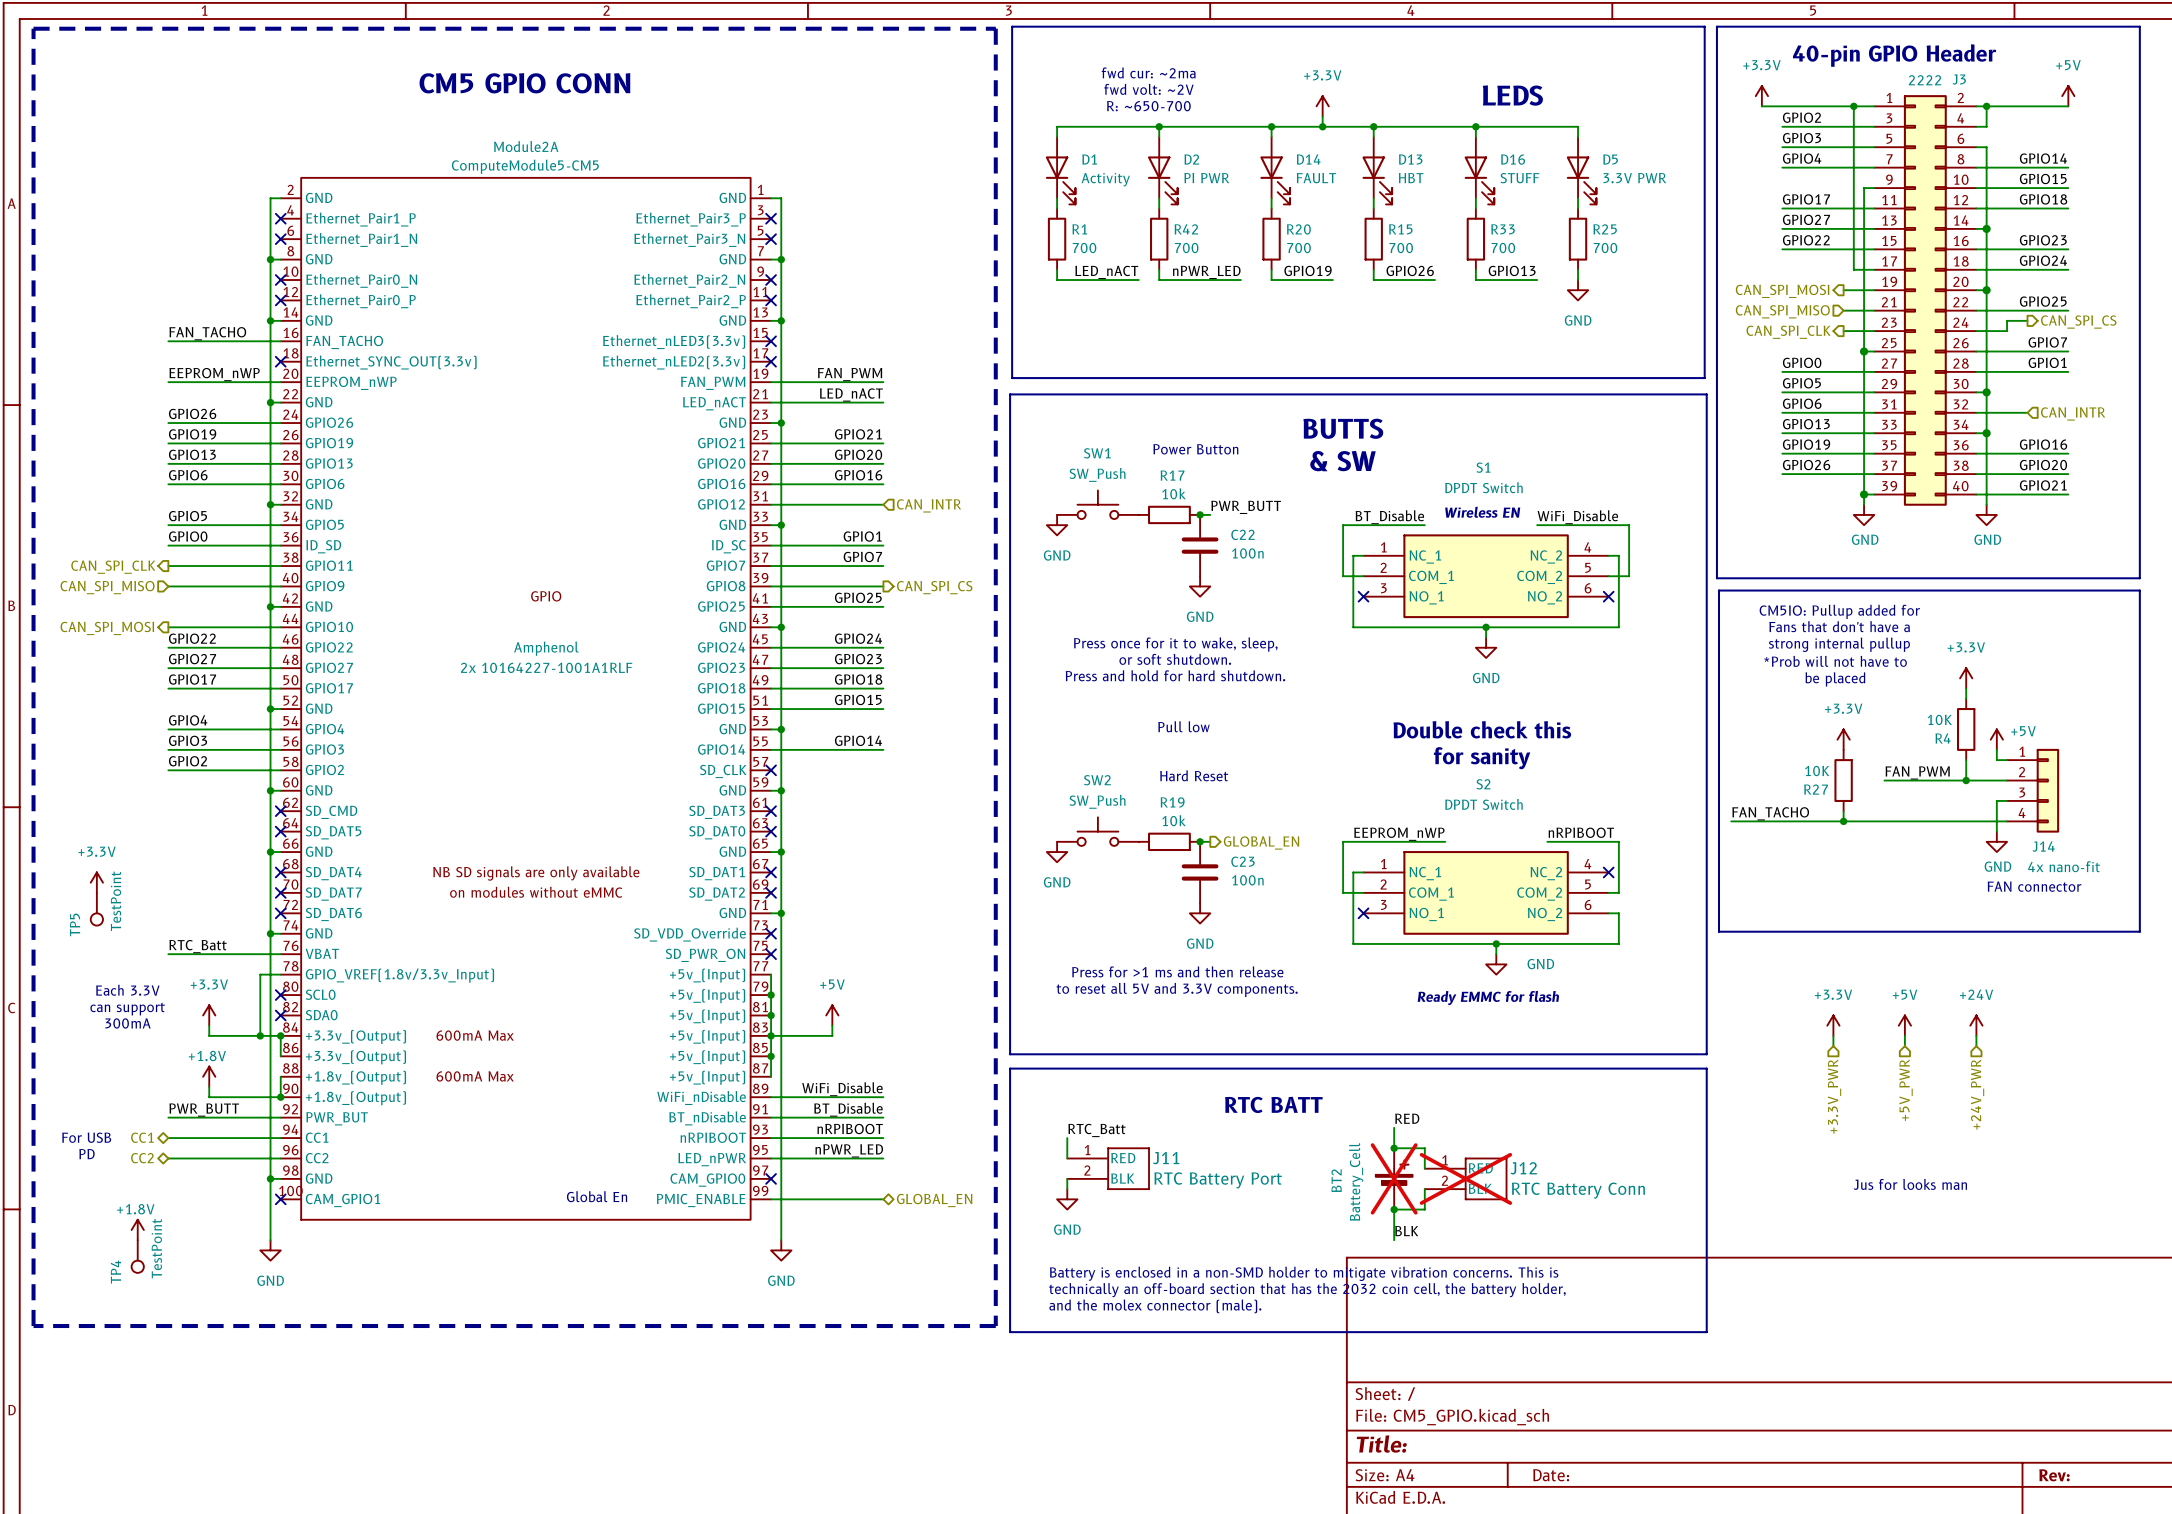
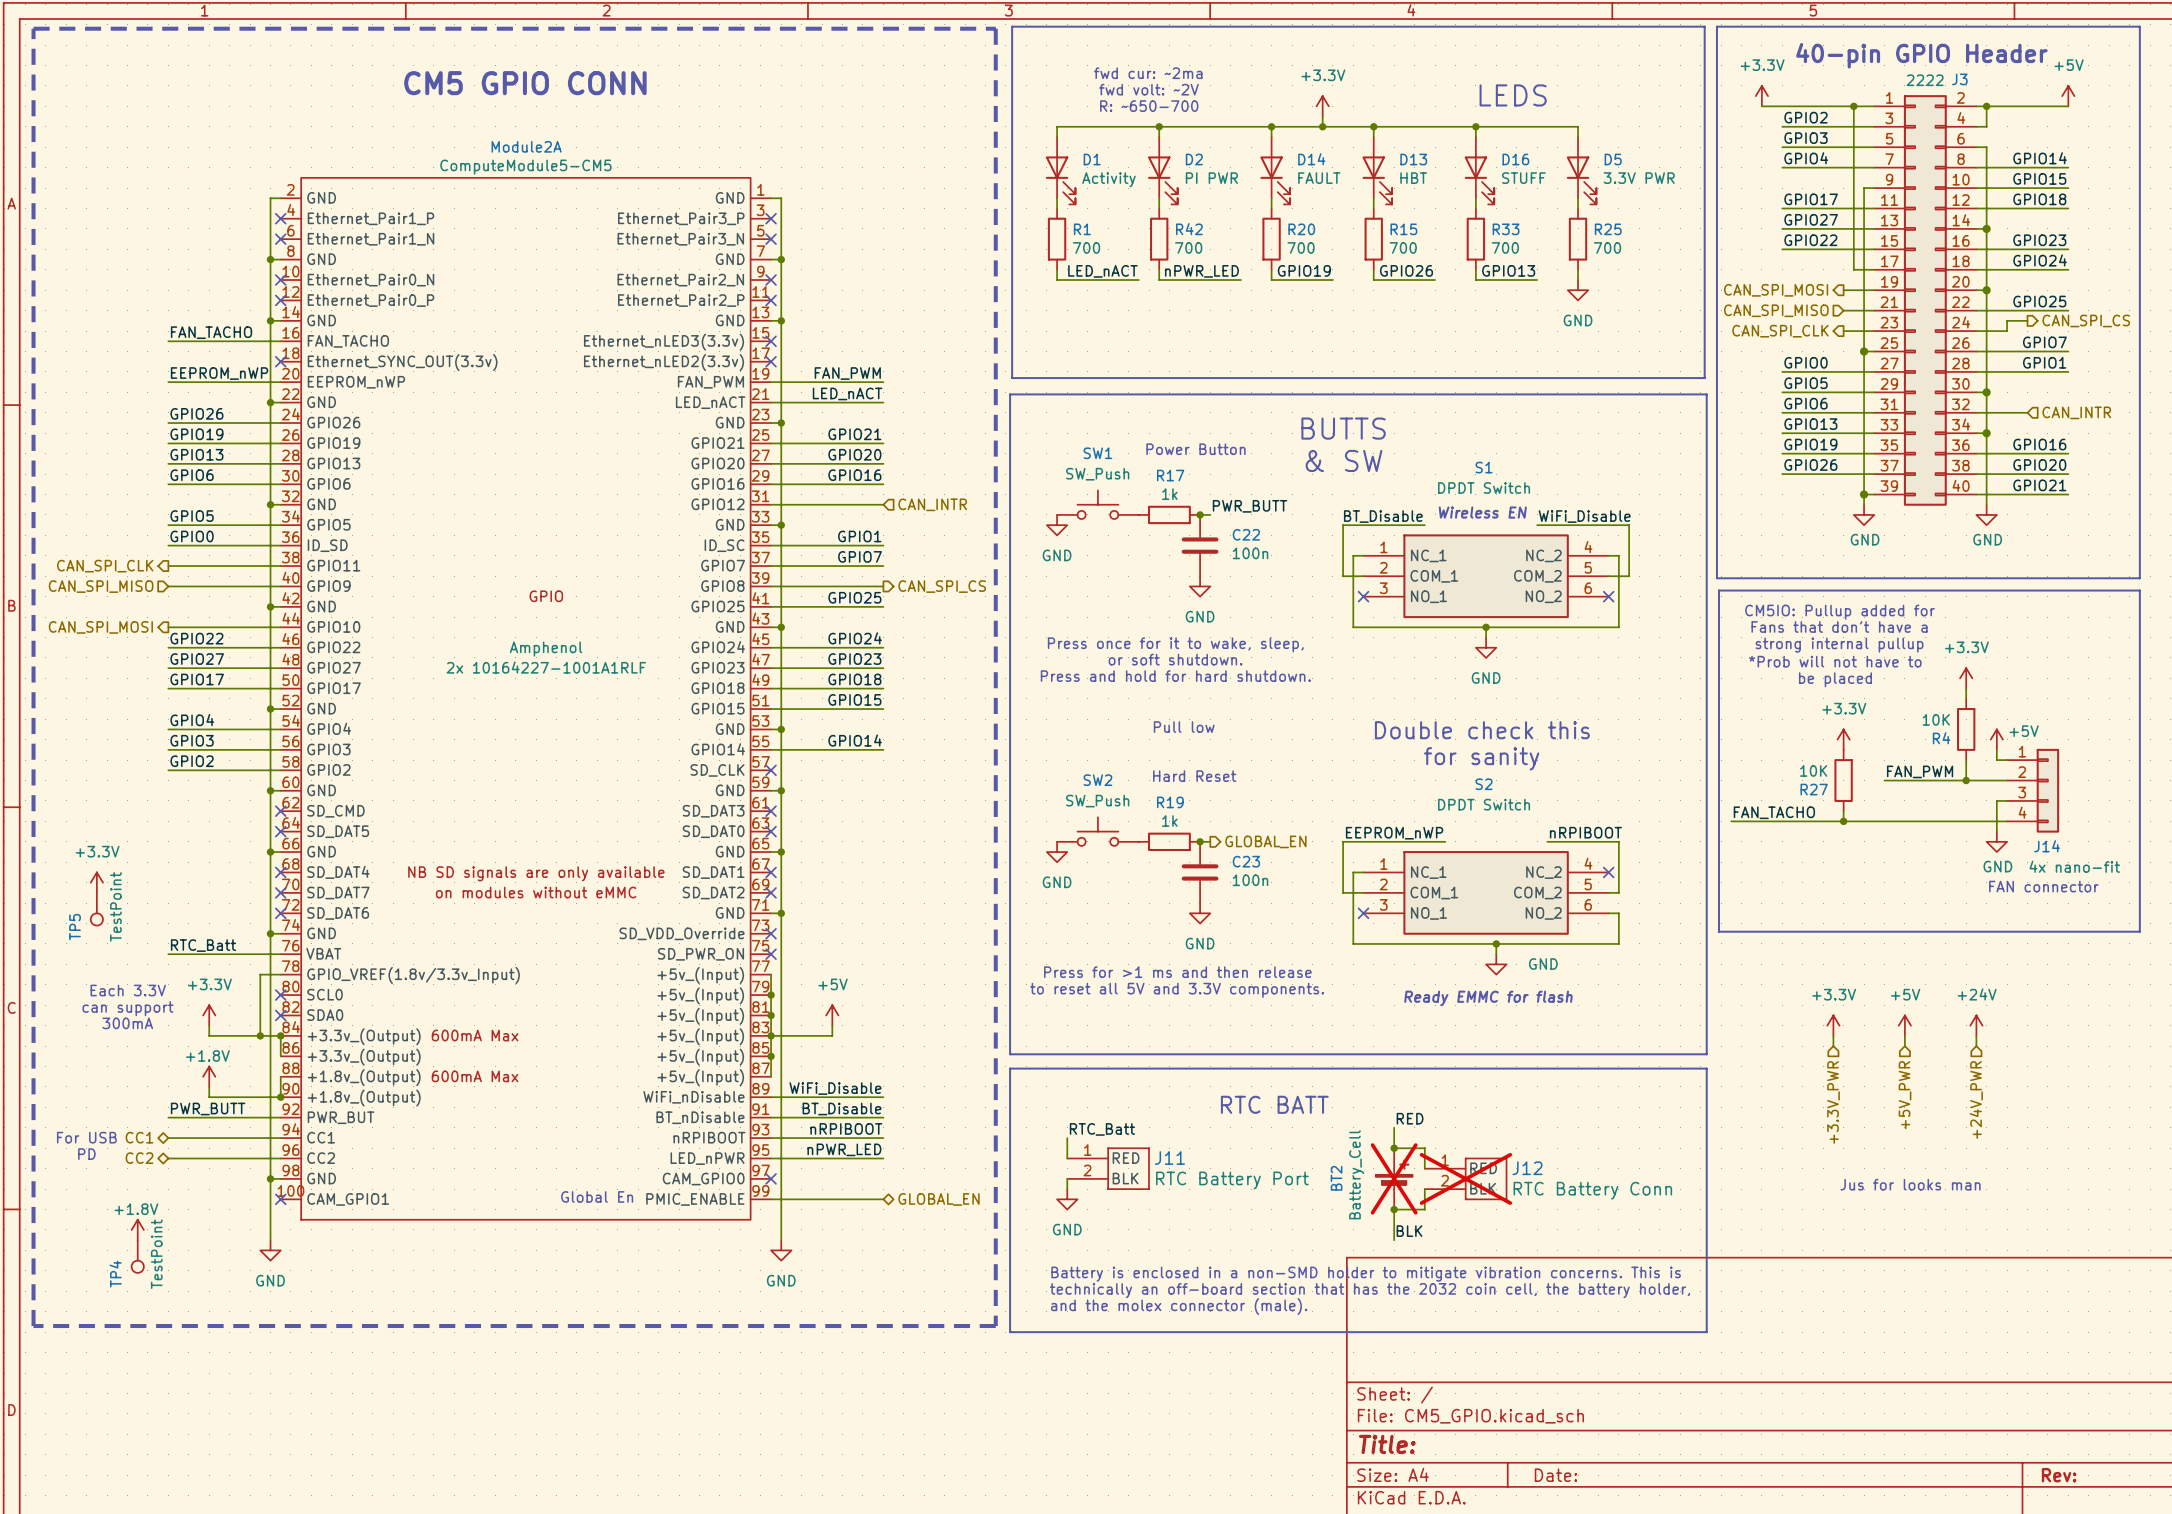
R17 value: 10k (1174, 493) -> 1k (1169, 494)
R19 value: 10k (1174, 820) -> 1k (1169, 821)

